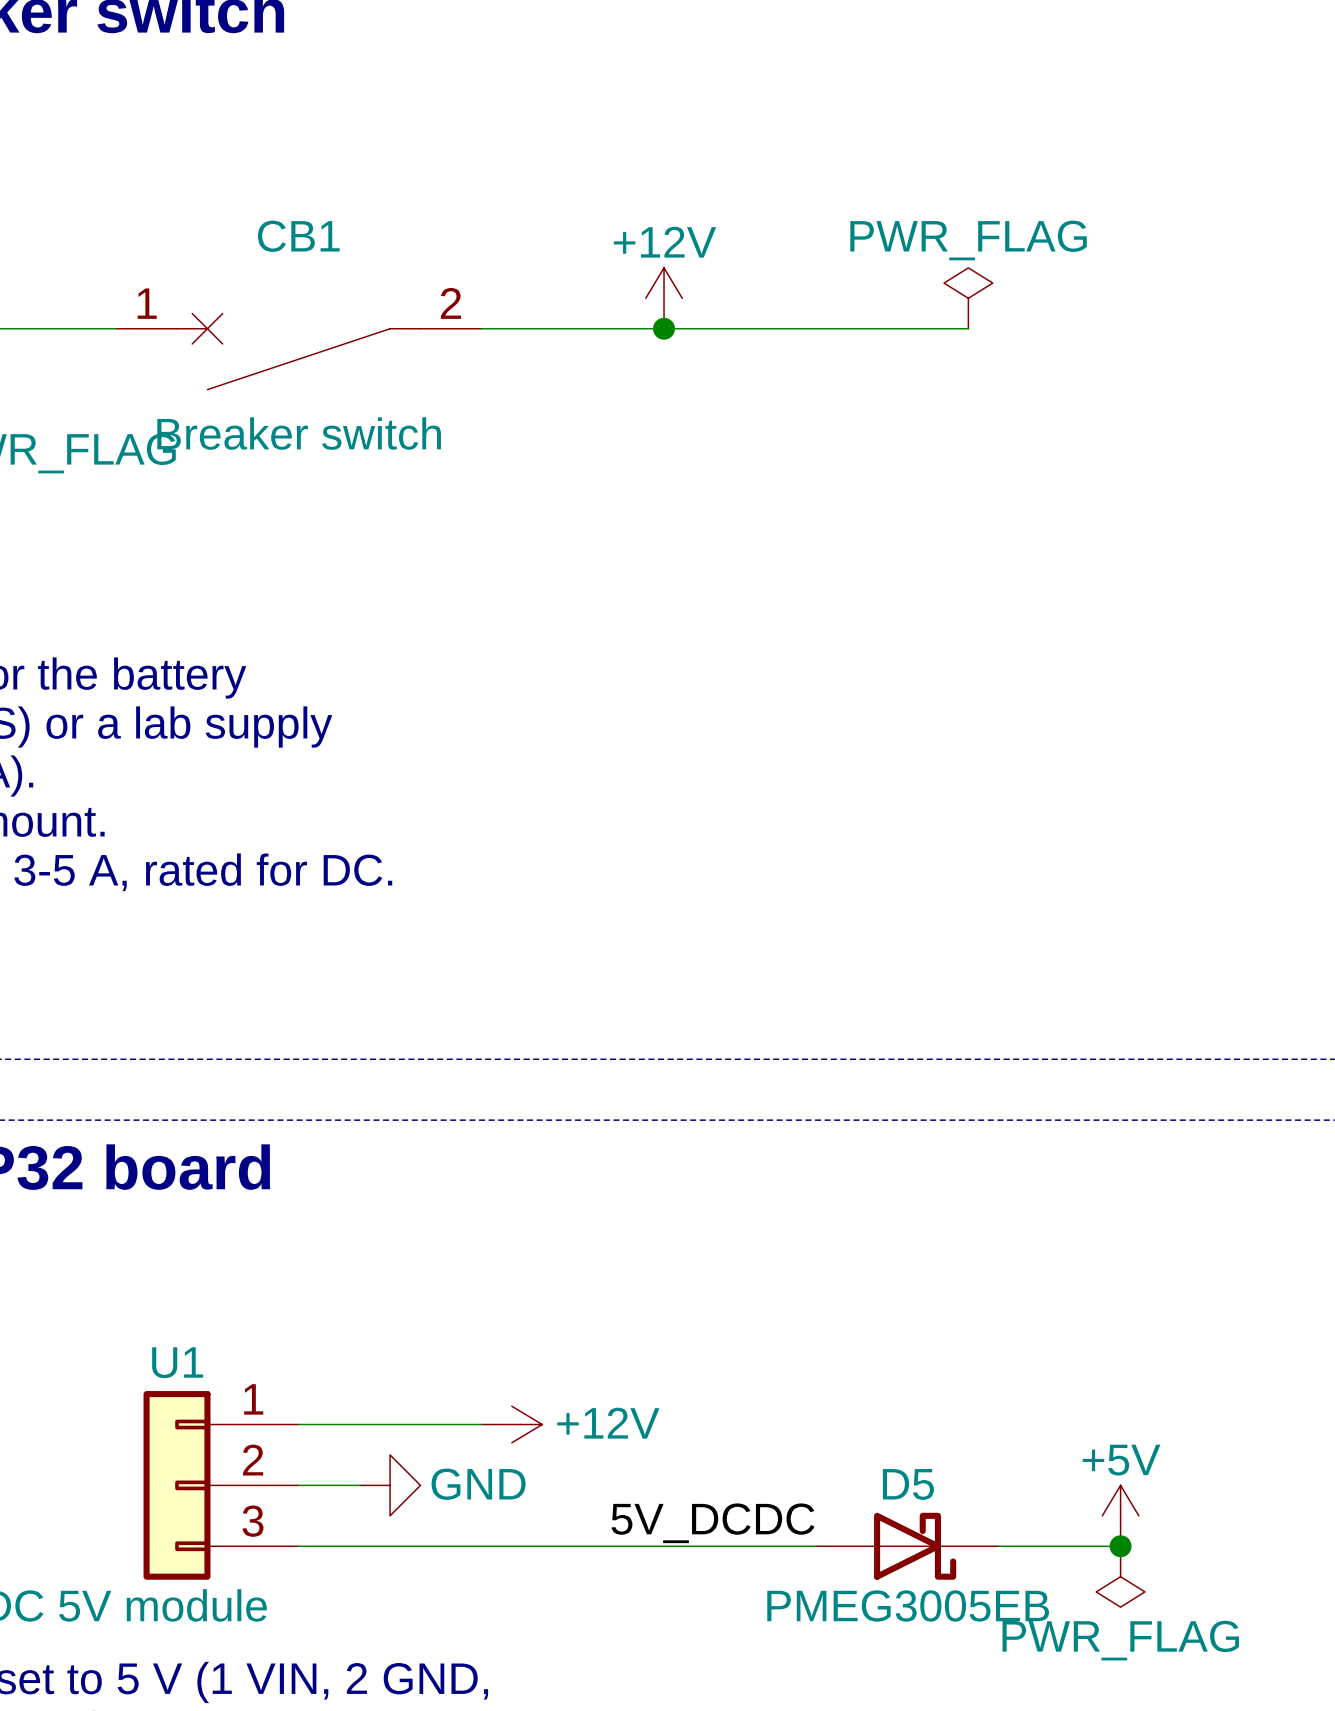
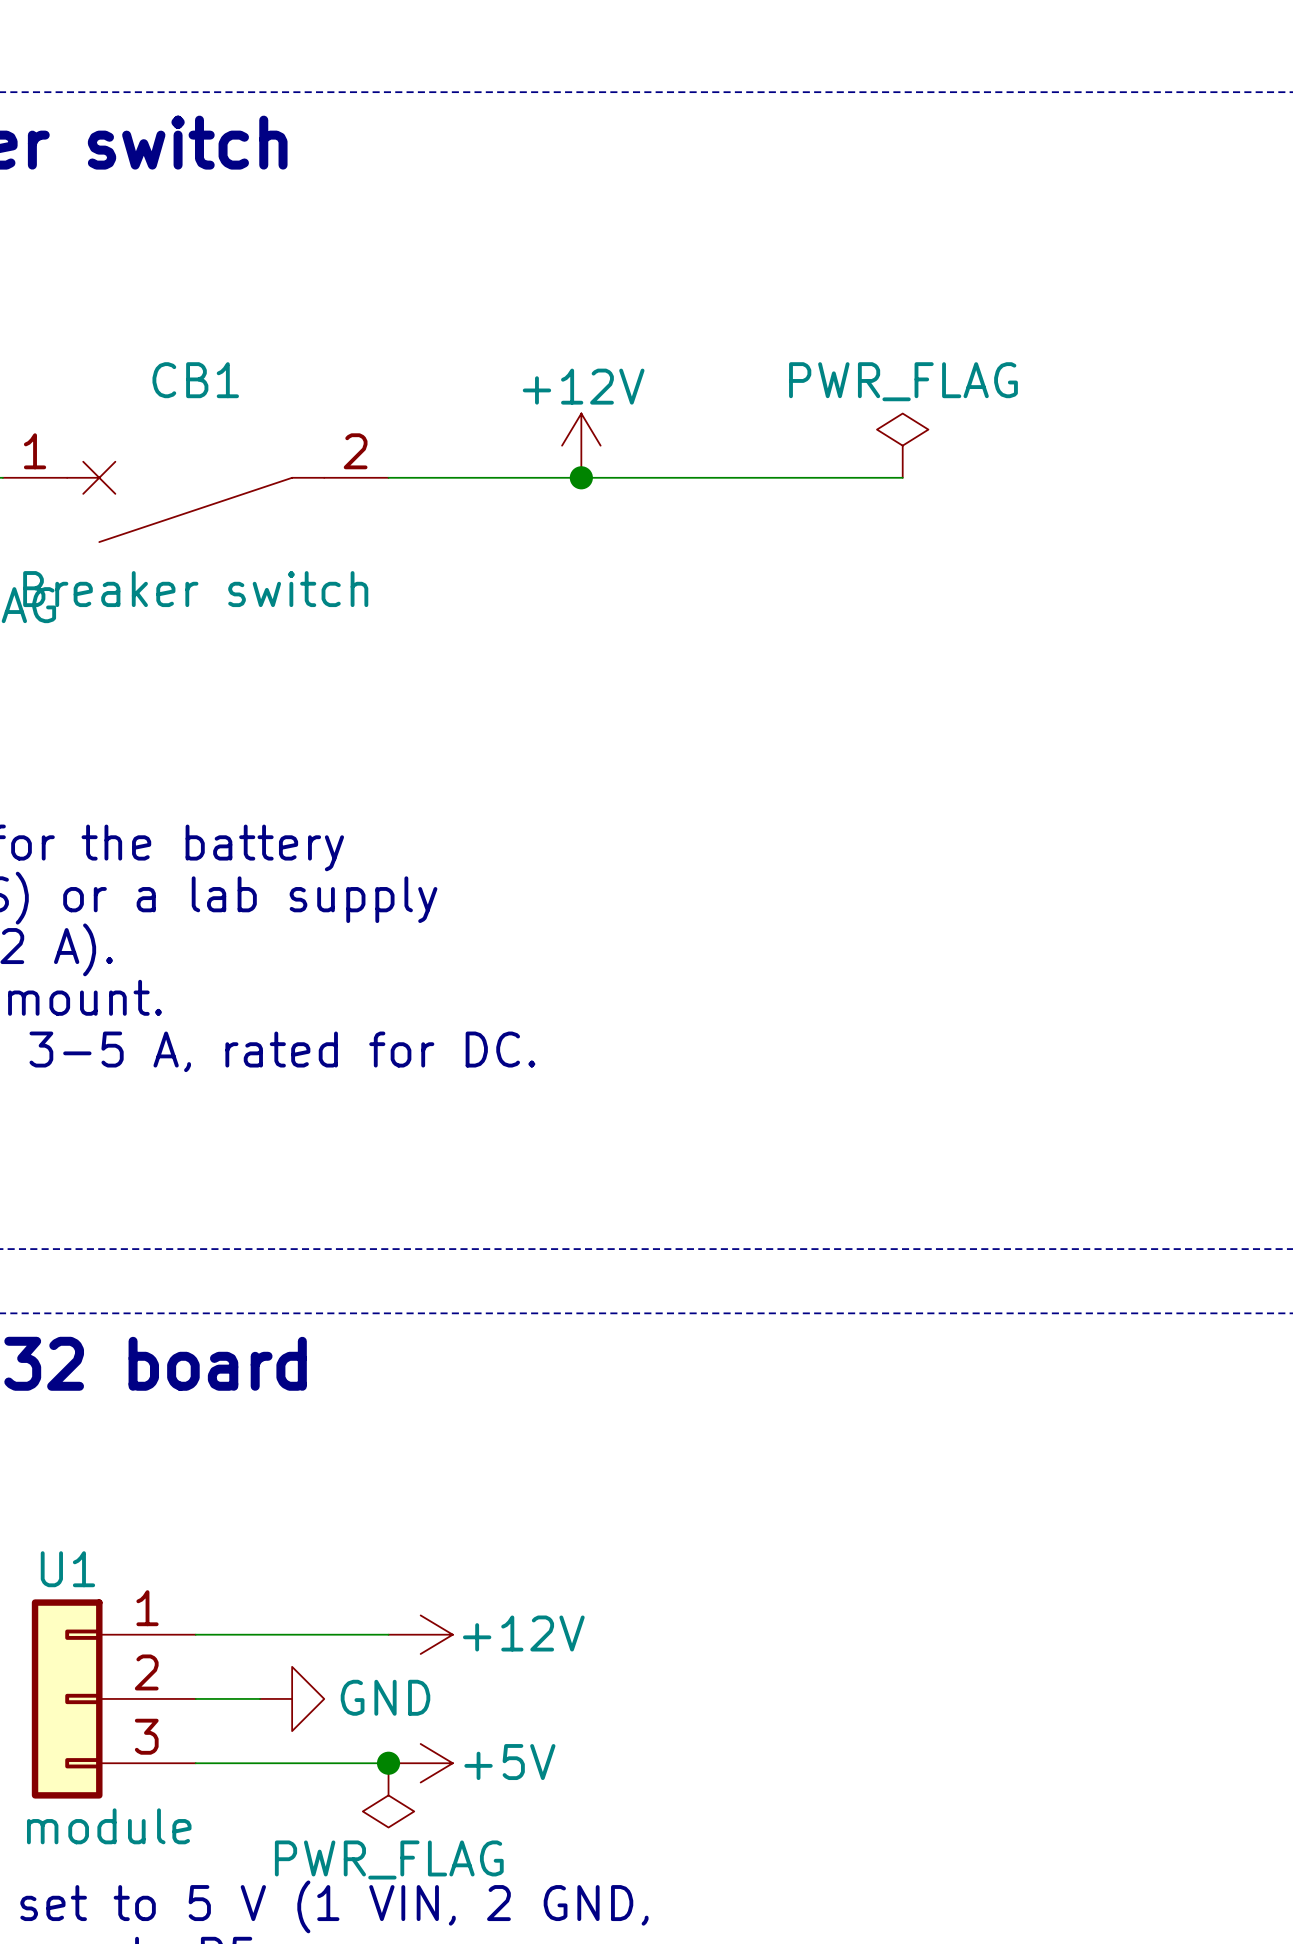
power symbol: +5V (1120, 1515) -> none
label: 5V_DCDC (712, 1523) -> none
wire: (481, 1546) (816, 1546) -> none
junction: none -> (388, 1763)
power symbol: none -> +5V (420, 1763)
D5: PMEG3005EB (907, 1546) -> none
wire: (998, 1546) (1120, 1546) -> none
junction: (1120, 1546) -> none
power symbol: none -> PWR_FLAG (388, 1795)
power symbol: PWR_FLAG (1120, 1576) -> none

